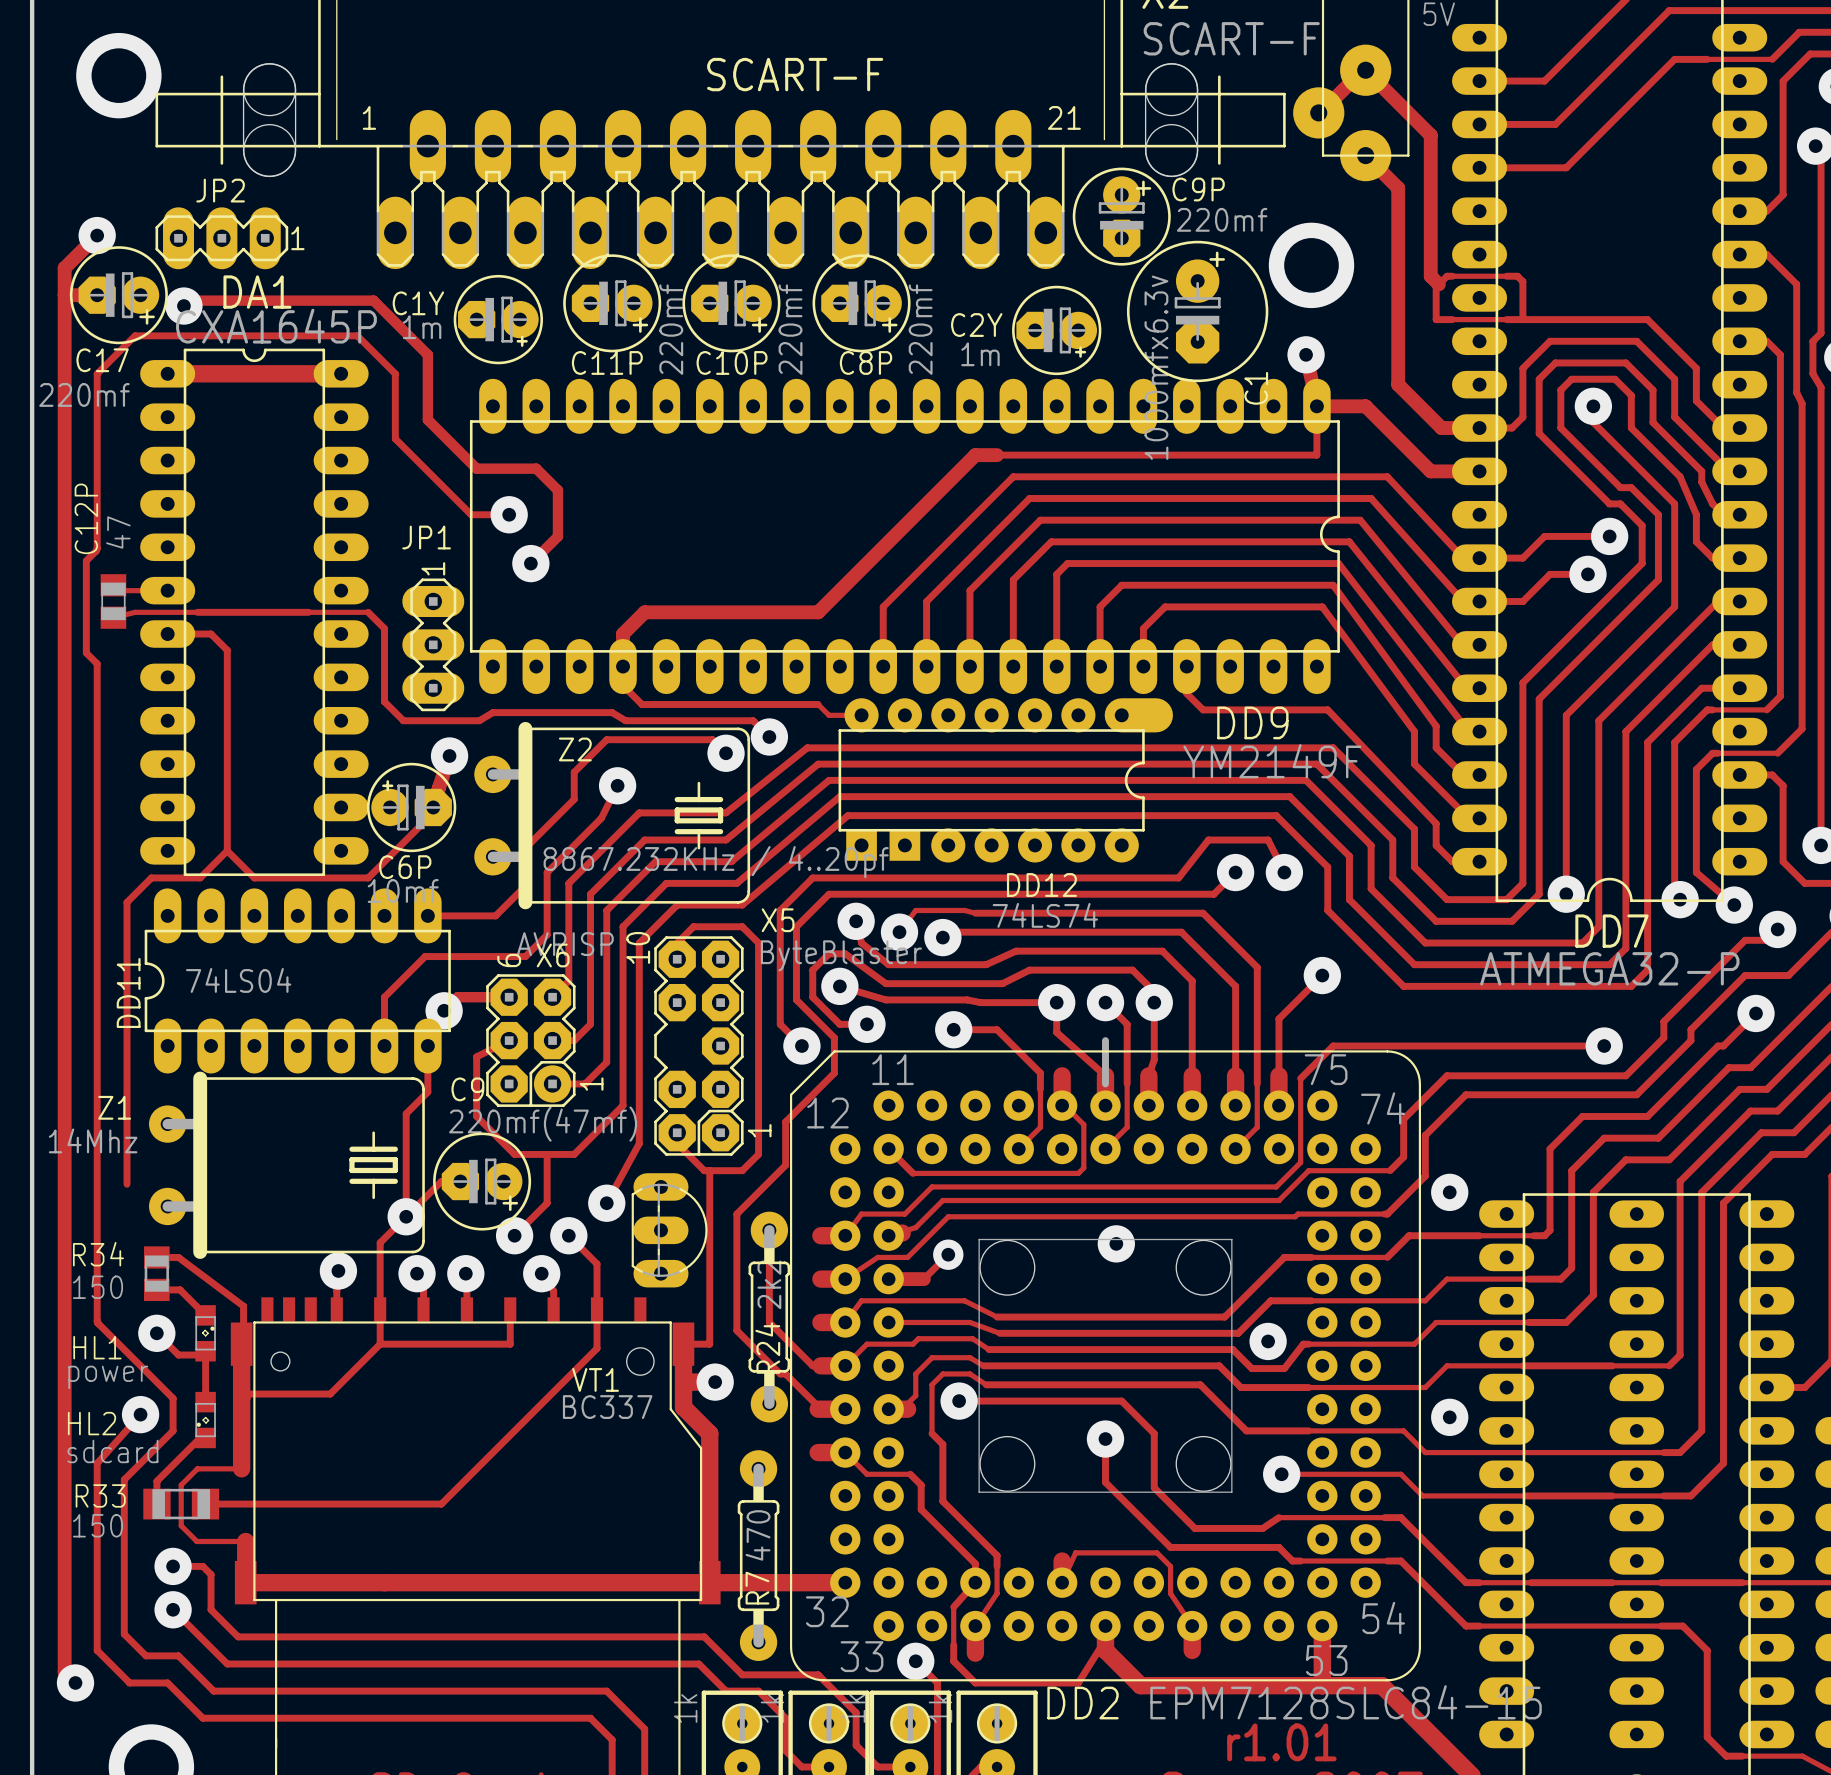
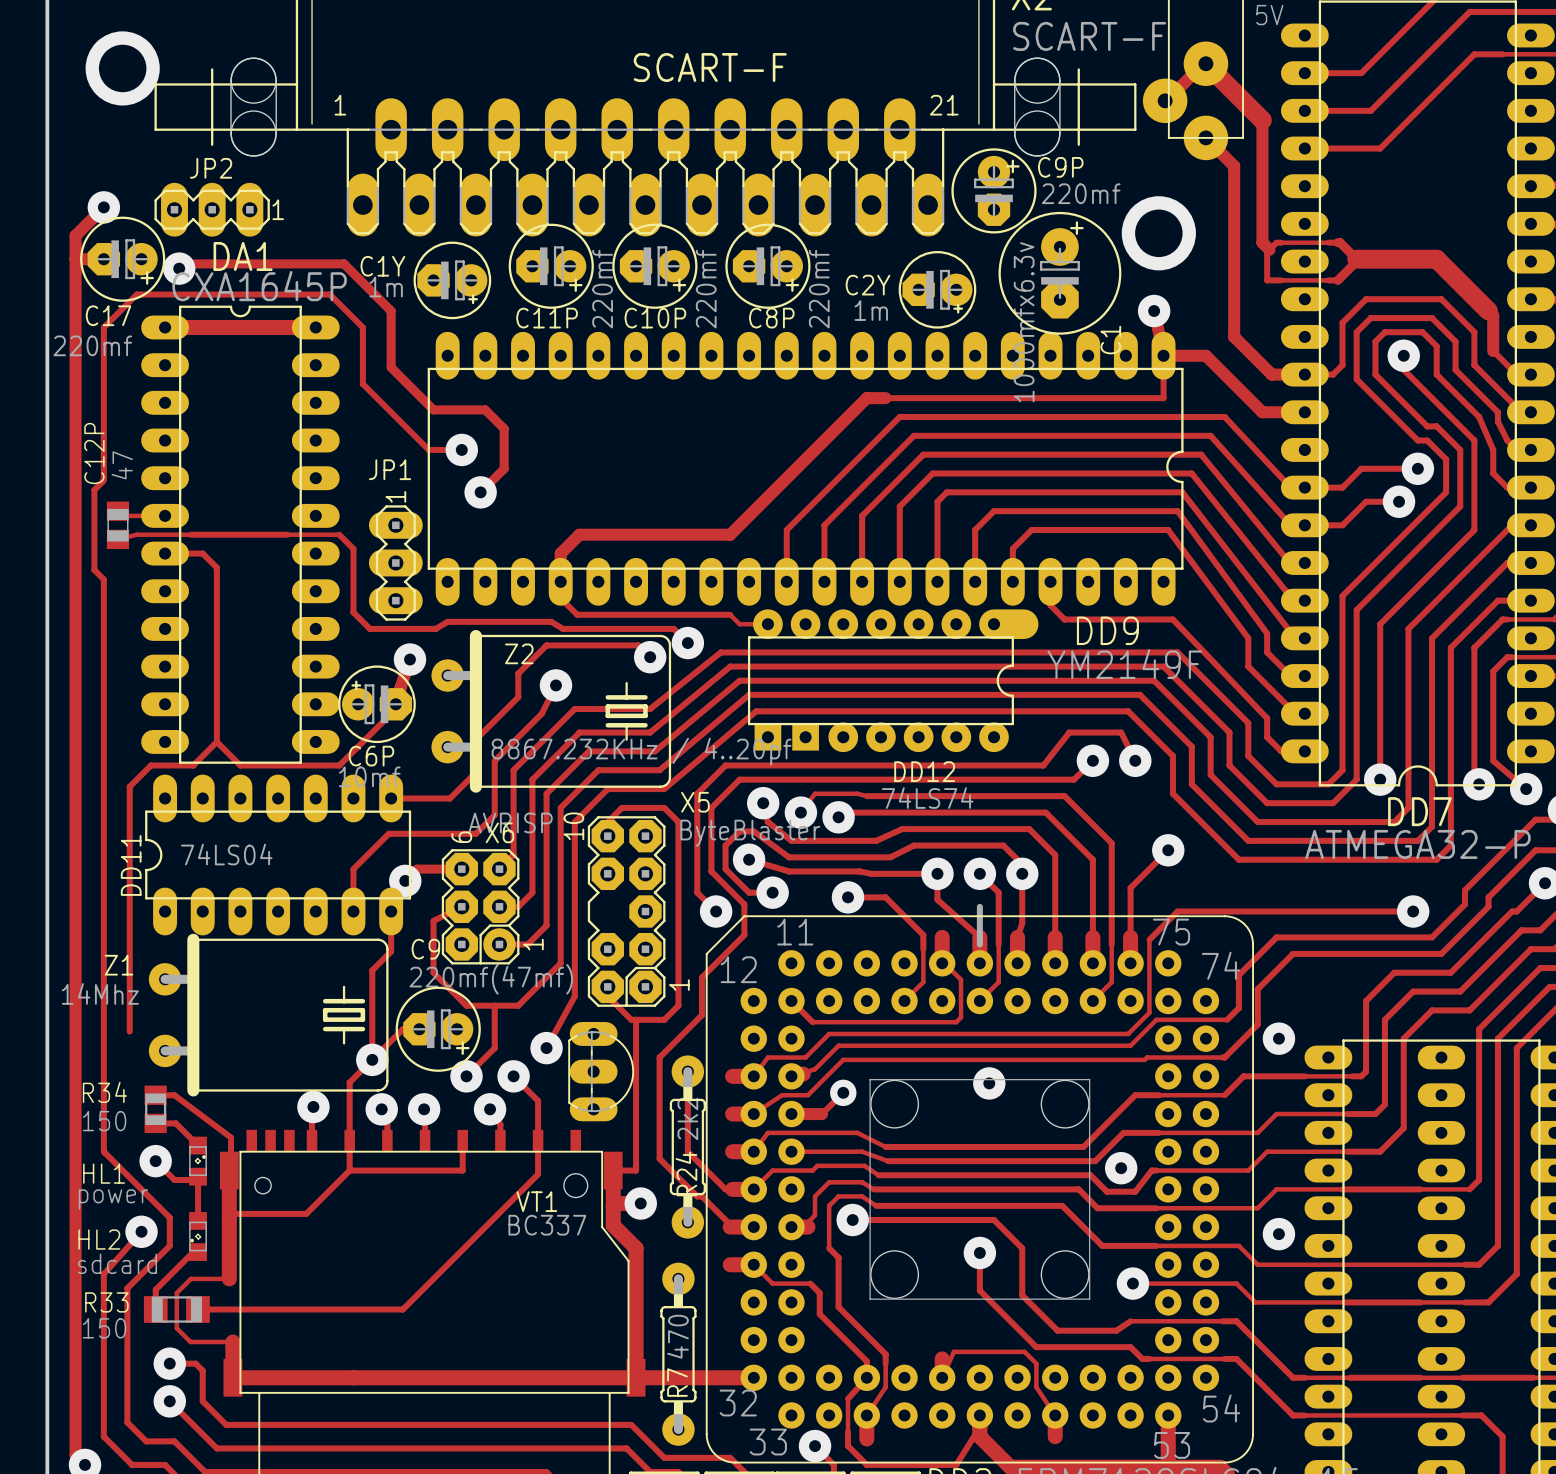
track width: thin (1365, 70) (1430, 135) -> thick (1205, 63) (1262, 120)
track: (1517, 276) (1522, 281) (1522, 319) -> none
track: none -> (1356, 261) (1337, 280)
track: (1517, 319) (1647, 319) (1696, 368) -> (1337, 242) (1340, 242) (1356, 259) (1436, 259) (1493, 315) (1493, 322)
track width: thin (1696, 368) (1696, 400) -> thick (1493, 322) (1493, 351)

